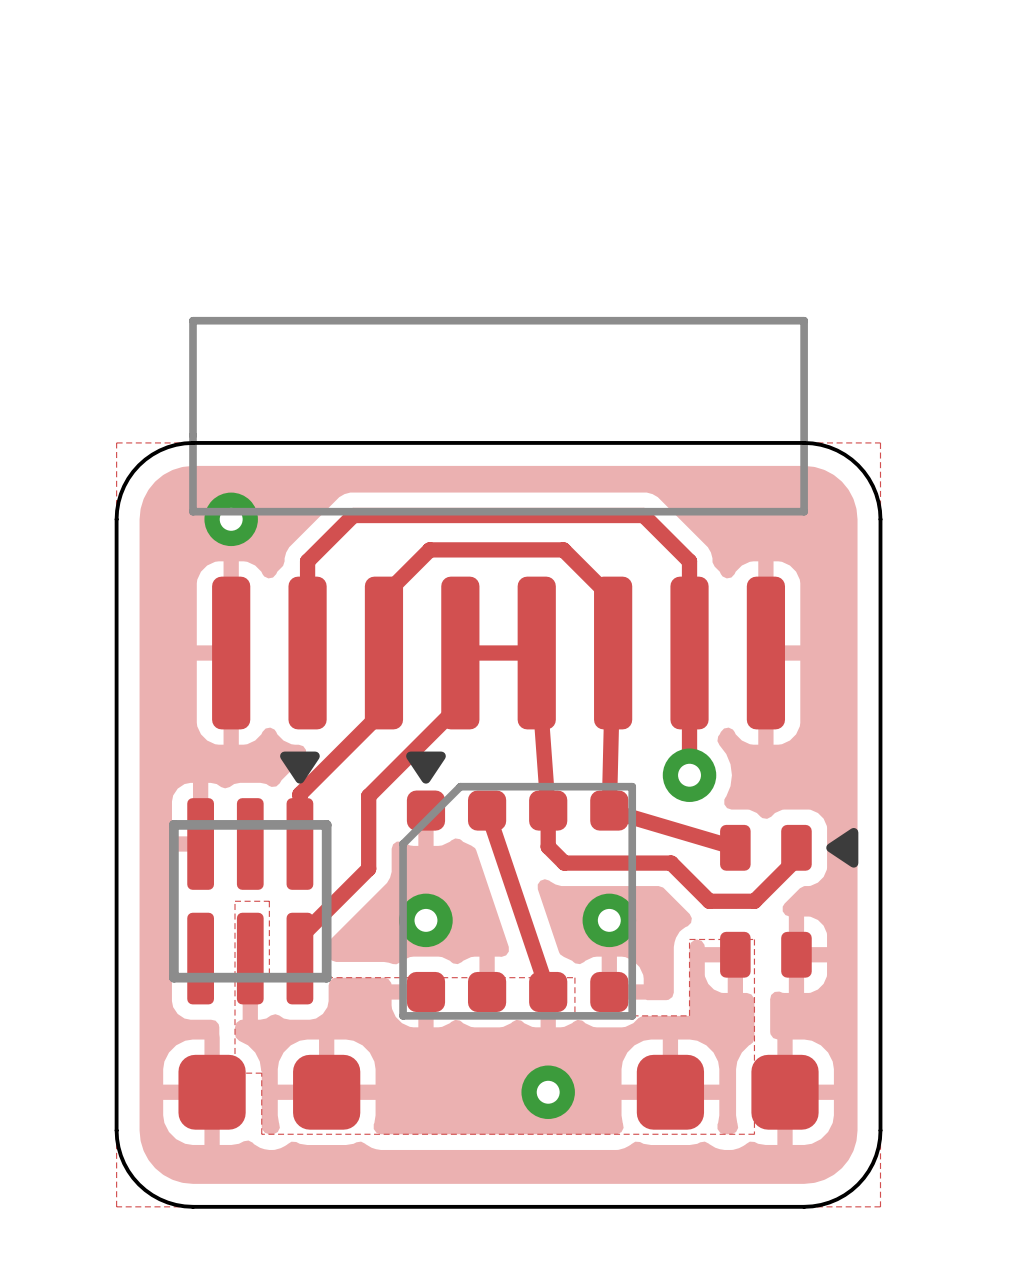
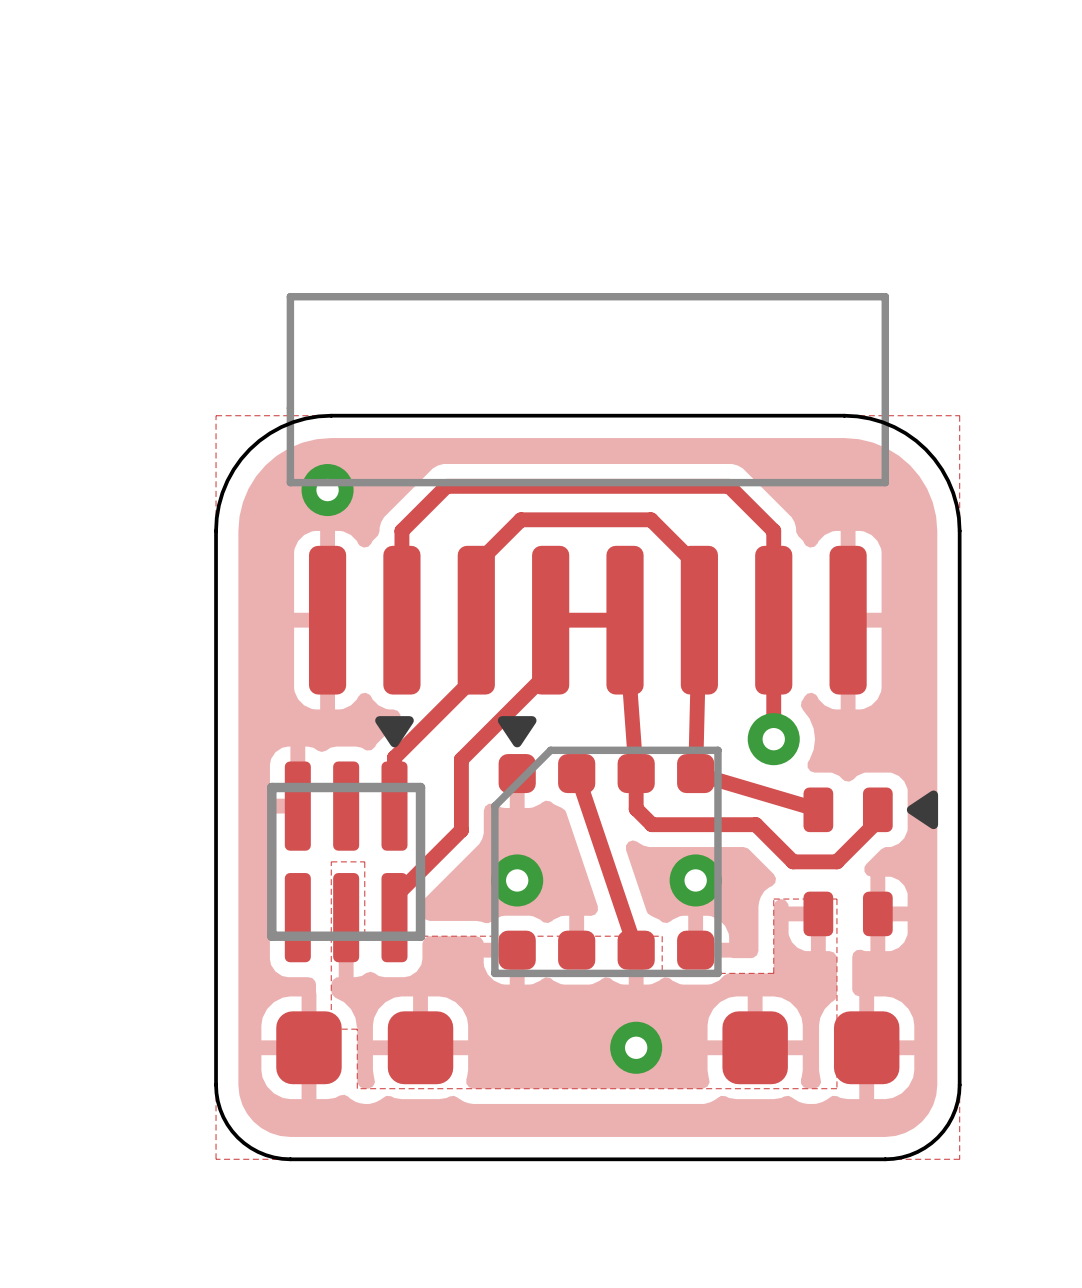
board edge: (235, 442) (175, 444) (159, 450) (138, 465) (128, 478) (118, 502) (116, 561) -> (331, 415) (305, 418) (281, 427) (249, 449) (233, 469) (222, 492) (216, 530)
board edge: (762, 442) (821, 444) (844, 454) (858, 465) (868, 478) (878, 502) (880, 561) -> (844, 415) (882, 422) (905, 433) (925, 449) (941, 469) (953, 492) (959, 530)

